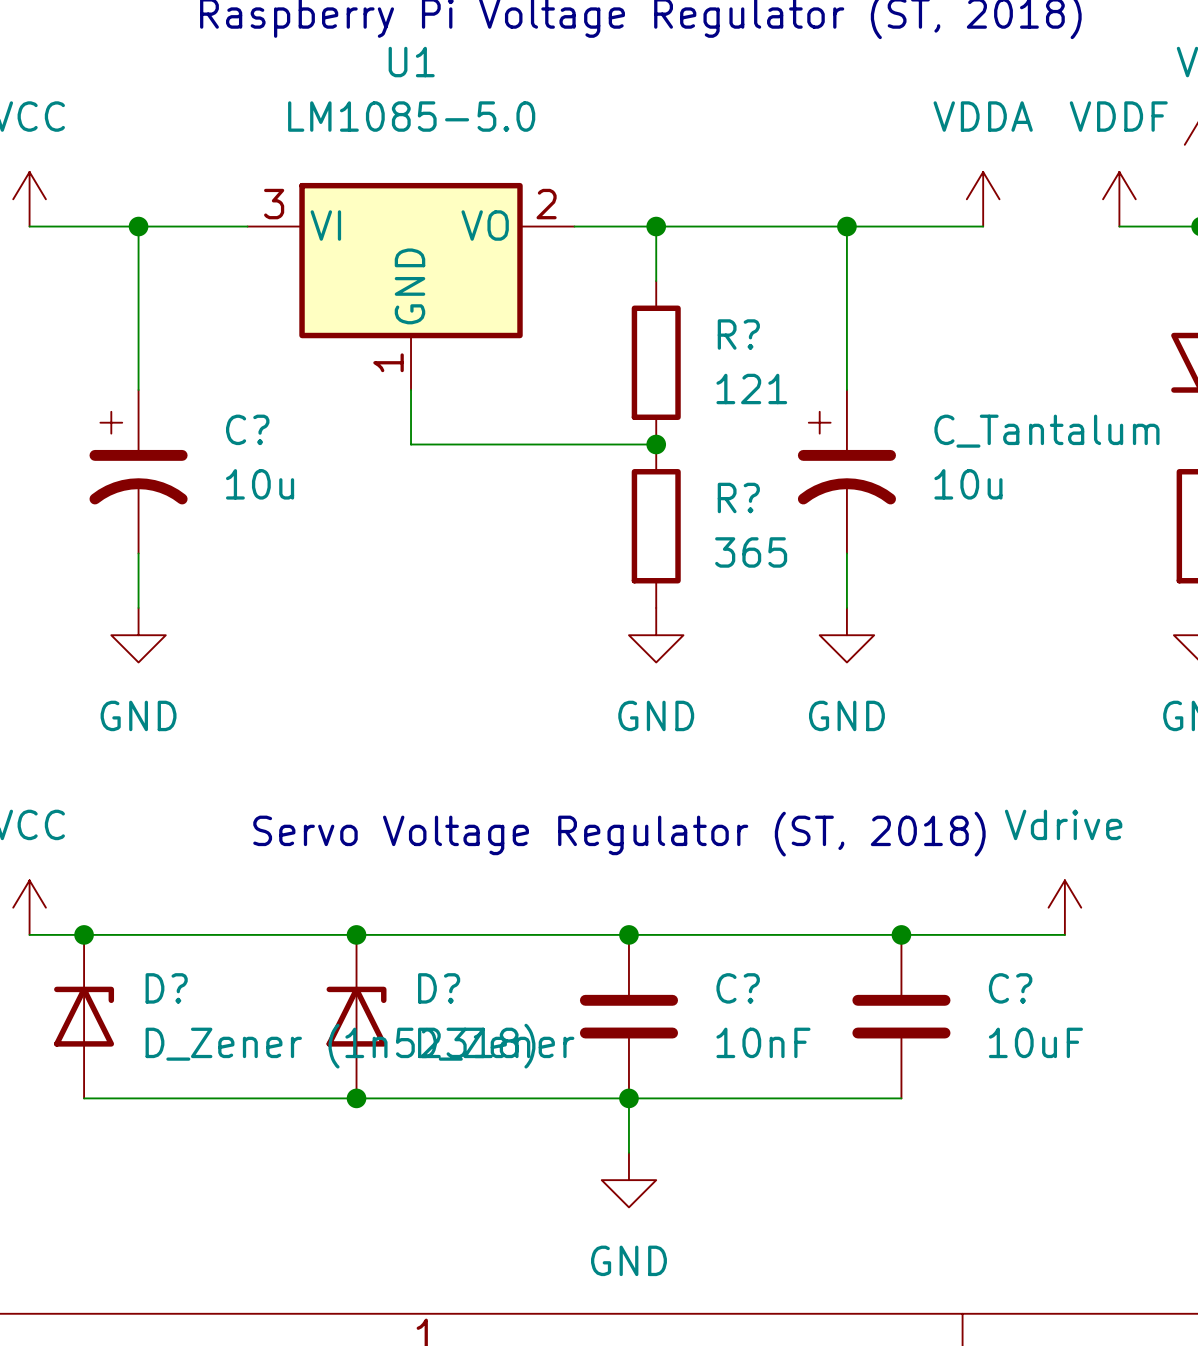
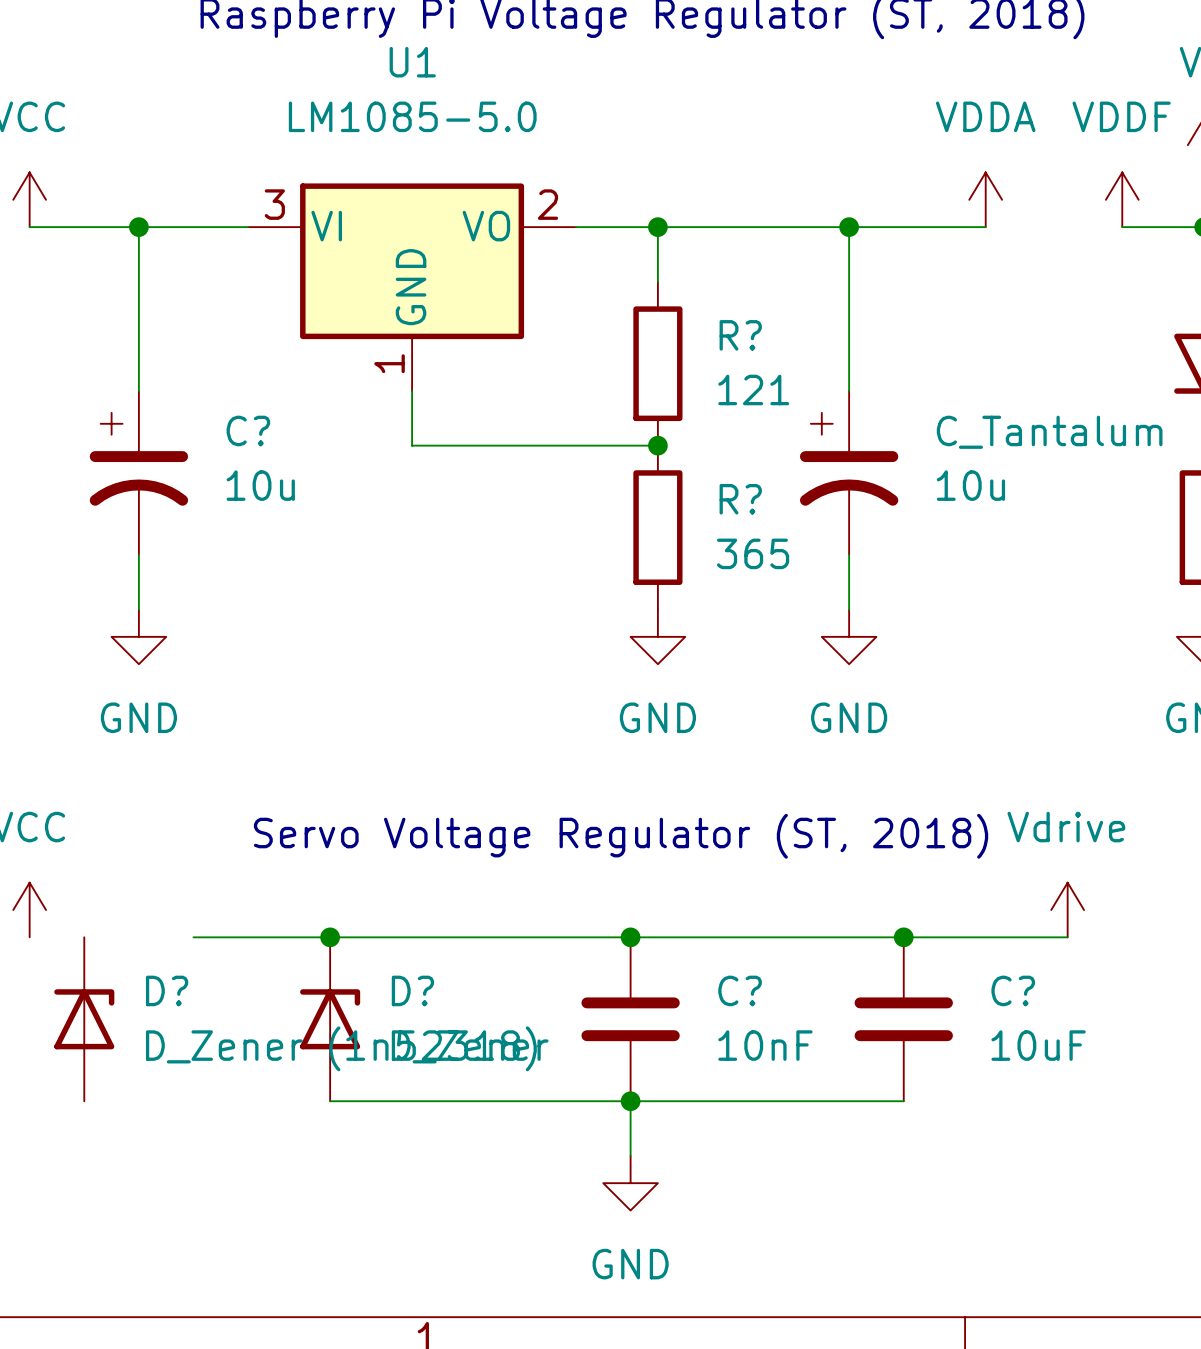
wire: (29, 934) (193, 934) -> none
junction: (84, 934) -> none
junction position: (356, 934) -> (330, 937)
D? position: (356, 1016) -> (330, 1019)
wire: (84, 1098) (329, 1098) -> none
junction: (356, 1098) -> none

